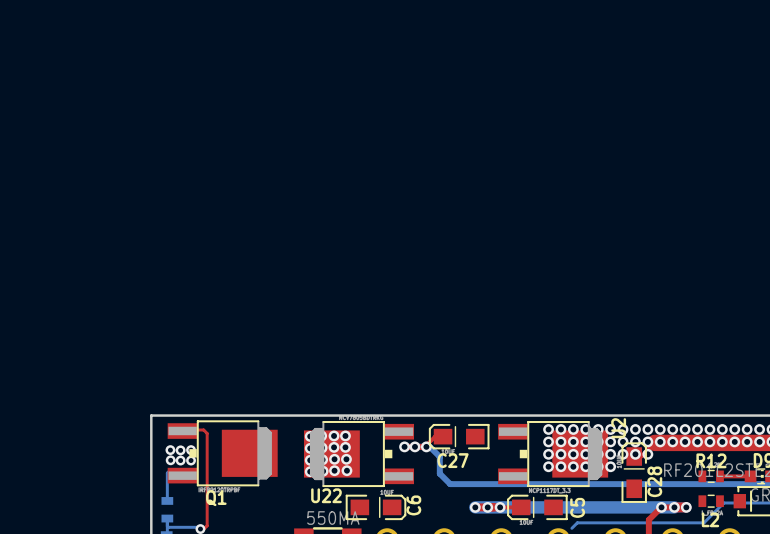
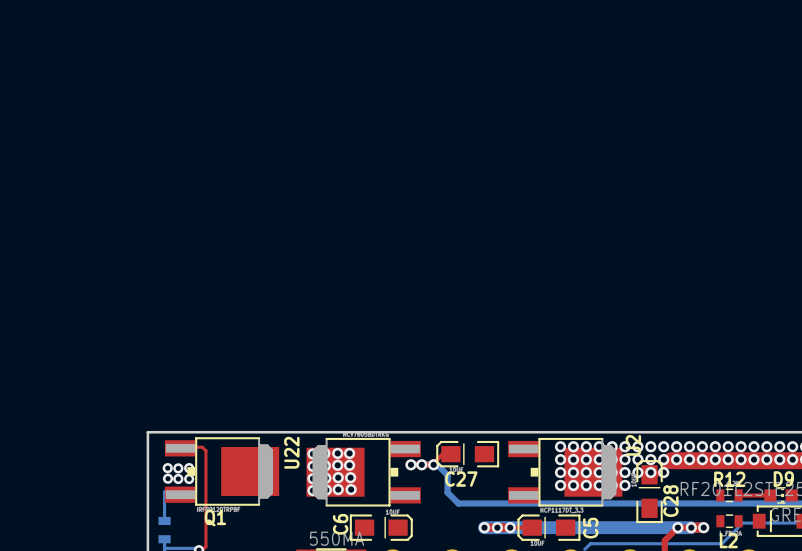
U22 name rotation: 0° (326, 495) -> 90° counterclockwise (291, 452)
U22 name position: U22 (326, 495) -> U22 (291, 452)
C6 name position: C6 (413, 505) -> C6 (340, 524)

